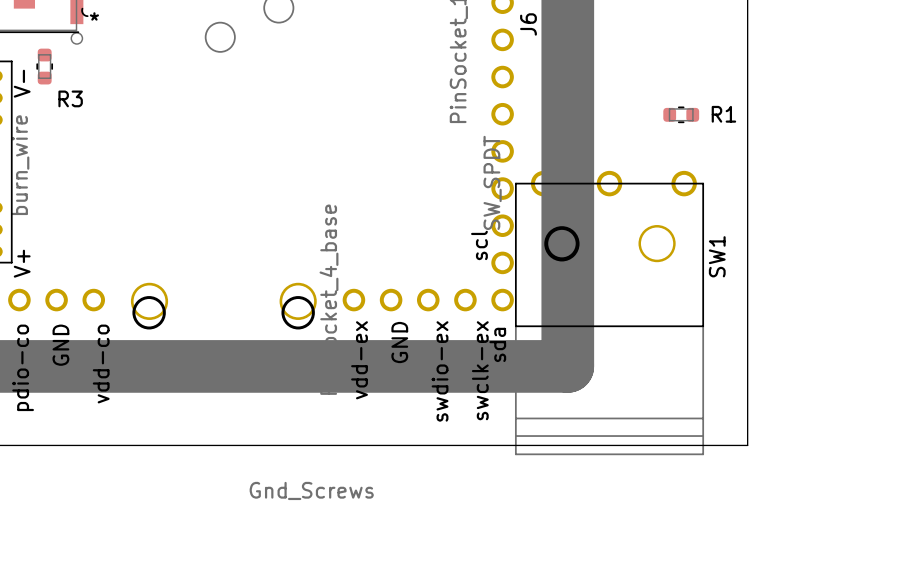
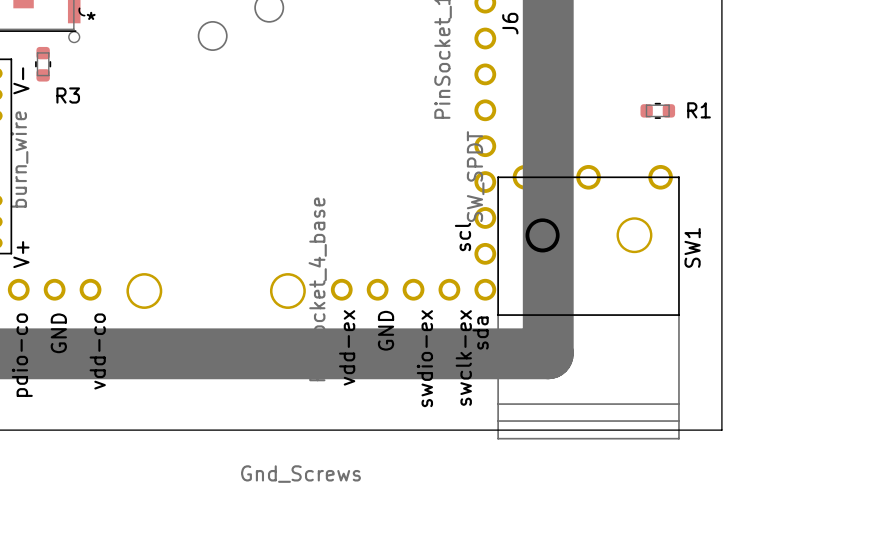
drawing: [132, 296, 166, 330] -> none
drawing: [281, 296, 315, 330] -> none

